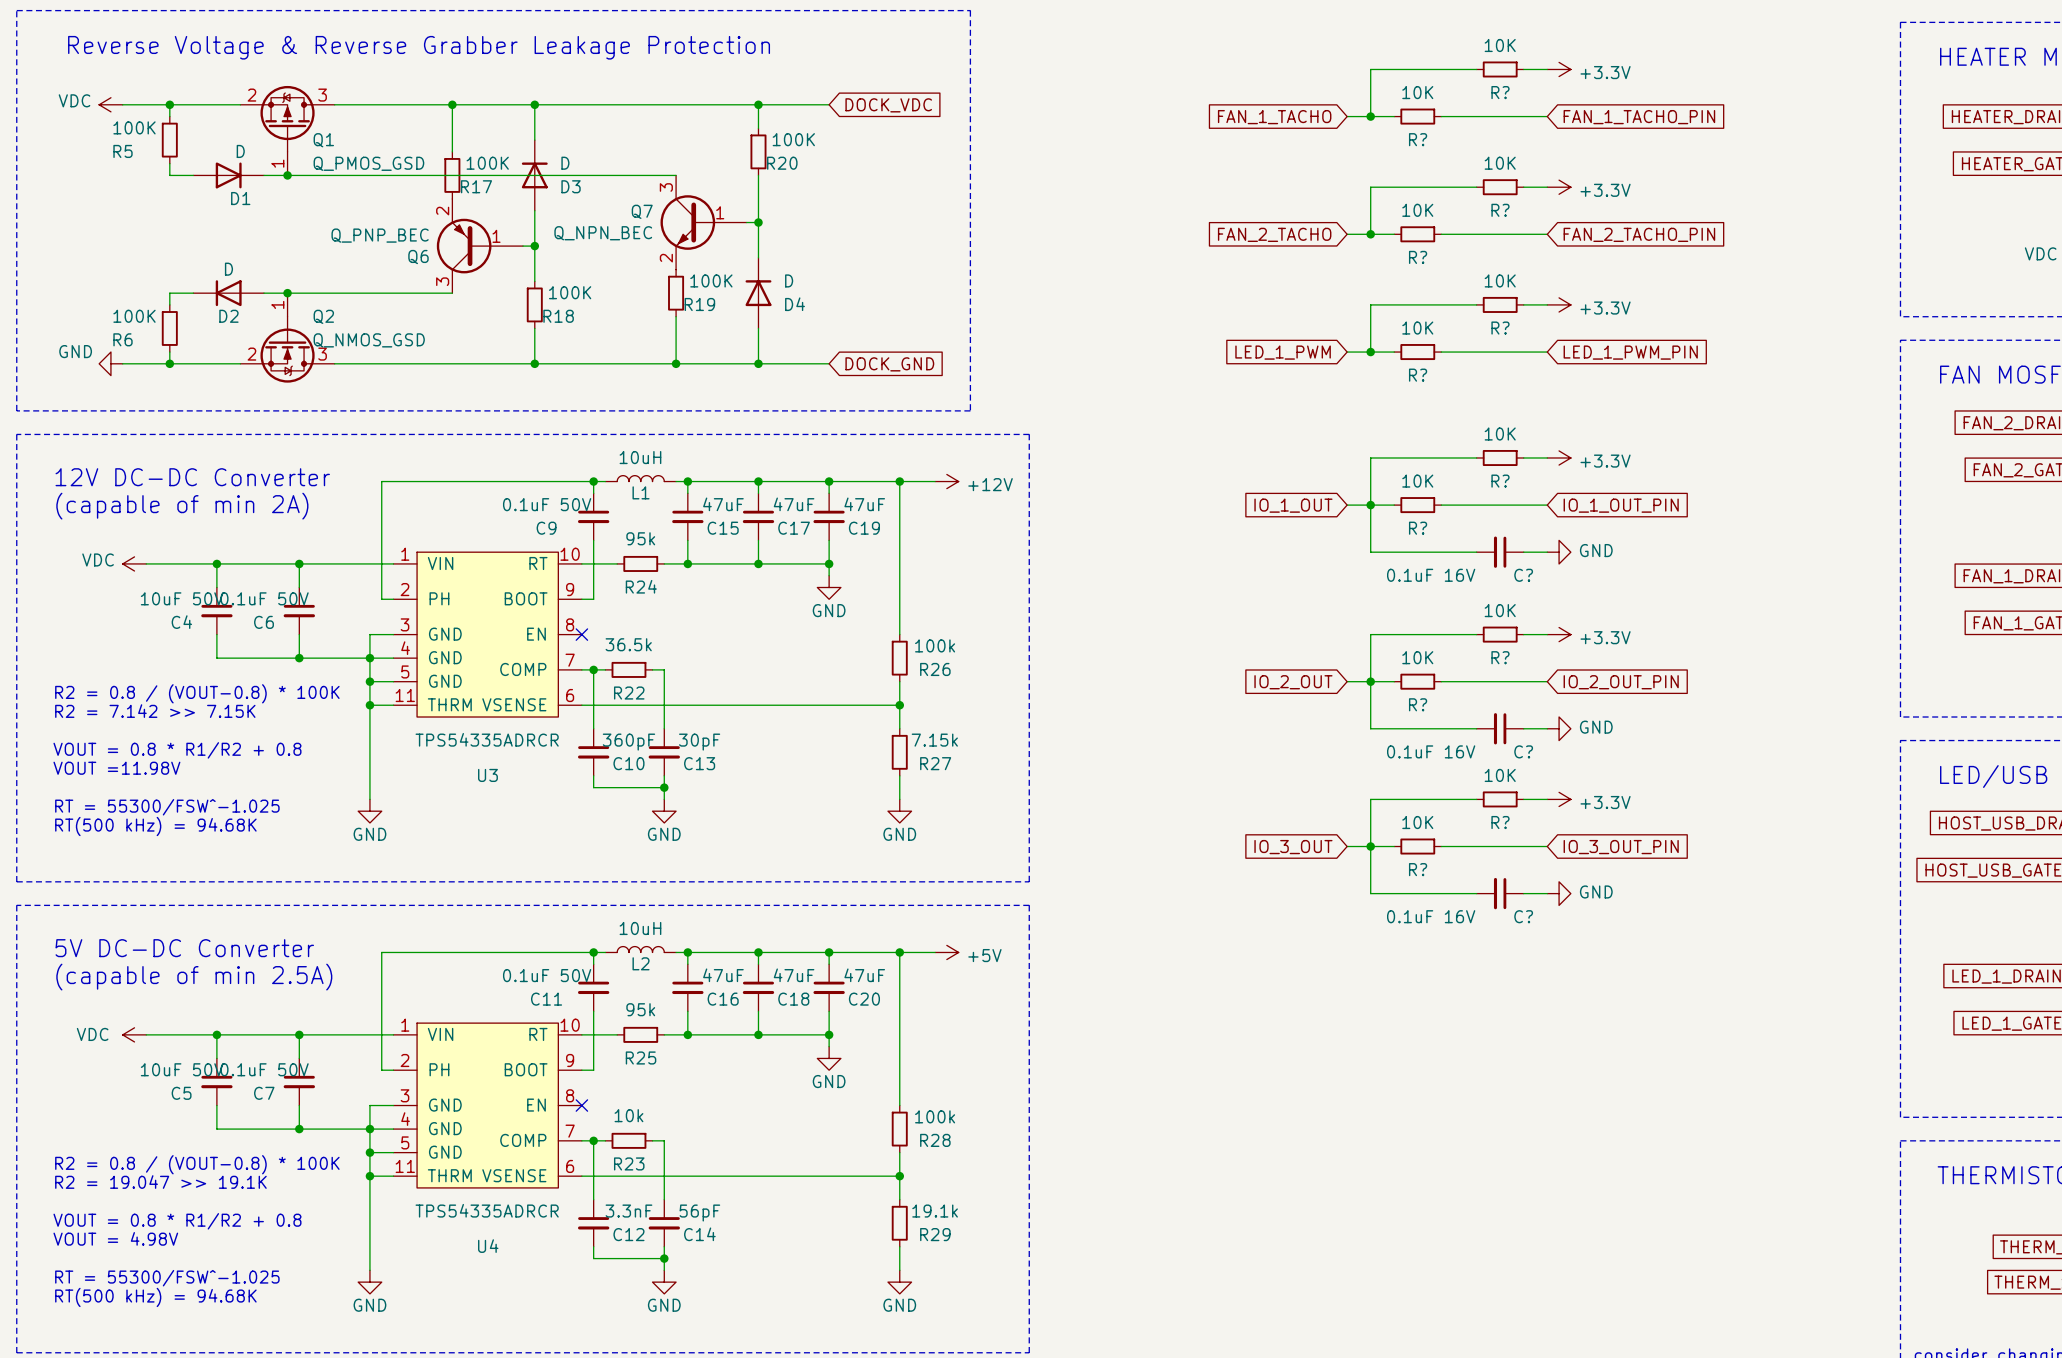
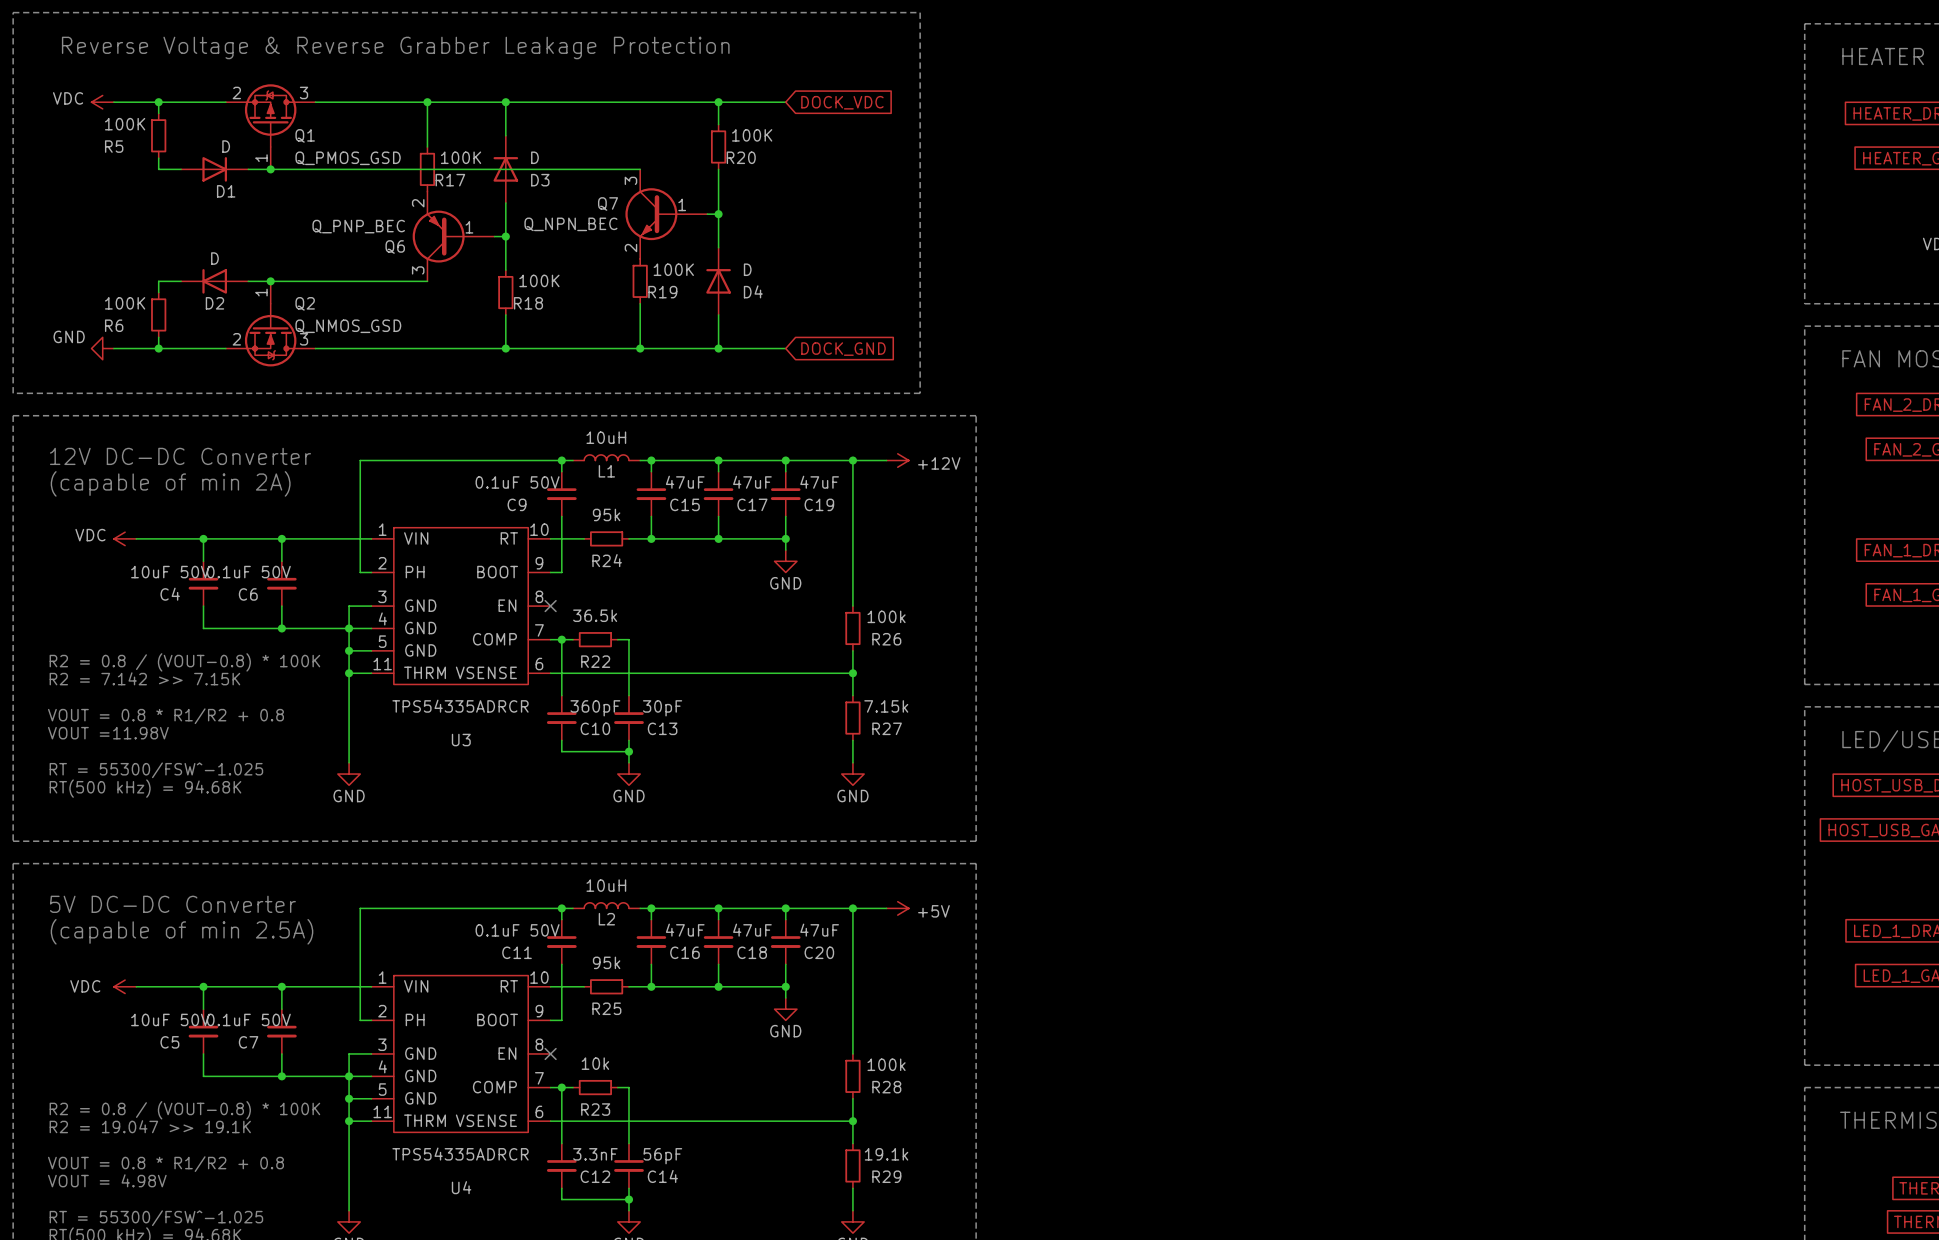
wire: (1476, 69) (1370, 69) (1370, 116) -> none
R?: 10K (1500, 69) -> none
wire: (1523, 69) (1547, 69) -> none
power symbol: +3.3V (1559, 69) -> none
wire: (1347, 116) (1394, 116) -> none
junction: (1370, 116) -> none
R?: 10K (1417, 116) -> none
wire: (1441, 116) (1547, 116) -> none
global label: FAN_1_TACHO (1274, 117) -> none
global label: FAN_1_TACHO_PIN (1639, 117) -> none
wire: (1476, 187) (1370, 187) (1370, 234) -> none
R?: 10K (1500, 187) -> none
wire: (1523, 187) (1547, 187) -> none
power symbol: +3.3V (1559, 187) -> none
global label: FAN_2_TACHO (1274, 234) -> none
wire: (1347, 234) (1394, 234) -> none
junction: (1370, 234) -> none
R?: 10K (1417, 234) -> none
wire: (1441, 234) (1547, 234) -> none
global label: FAN_2_TACHO_PIN (1639, 234) -> none
wire: (1476, 304) (1370, 304) (1370, 352) -> none
R?: 10K (1500, 304) -> none
wire: (1523, 304) (1547, 304) -> none
power symbol: +3.3V (1559, 304) -> none
global label: LED_1_PWM (1283, 352) -> none
wire: (1347, 352) (1394, 352) -> none
junction: (1370, 352) -> none
R?: 10K (1417, 352) -> none
wire: (1441, 352) (1547, 352) -> none
global label: LED_1_PWM_PIN (1630, 352) -> none
wire: (1476, 457) (1370, 457) (1370, 552) (1476, 552) -> none
R?: 10K (1500, 457) -> none
wire: (1523, 457) (1547, 457) -> none
power symbol: +3.3V (1559, 457) -> none
global label: IO_1_OUT (1293, 505) -> none
wire: (1347, 505) (1394, 505) -> none
junction: (1370, 505) -> none
R?: 10K (1417, 505) -> none
wire: (1441, 505) (1547, 505) -> none
global label: IO_1_OUT_PIN (1621, 505) -> none
C?: 0.1uF 16V (1500, 552) -> none
wire: (1523, 552) (1547, 552) -> none
power symbol: GND (1559, 552) -> none
wire: (1476, 634) (1370, 634) (1370, 728) (1476, 728) -> none
R?: 10K (1500, 634) -> none
wire: (1523, 634) (1547, 634) -> none
power symbol: +3.3V (1559, 634) -> none
wire: (1347, 681) (1394, 681) -> none
junction: (1370, 681) -> none
R?: 10K (1417, 681) -> none
wire: (1441, 681) (1547, 681) -> none
global label: IO_2_OUT (1293, 682) -> none
global label: IO_2_OUT_PIN (1621, 682) -> none
C?: 0.1uF 16V (1500, 728) -> none
wire: (1523, 728) (1547, 728) -> none
power symbol: GND (1559, 728) -> none
wire: (1476, 799) (1370, 799) (1370, 893) (1476, 893) -> none
R?: 10K (1500, 799) -> none
wire: (1523, 799) (1547, 799) -> none
power symbol: +3.3V (1559, 799) -> none
wire: (1347, 846) (1394, 846) -> none
junction: (1370, 846) -> none
R?: 10K (1417, 846) -> none
wire: (1441, 846) (1547, 846) -> none
global label: IO_3_OUT (1293, 847) -> none
global label: IO_3_OUT_PIN (1621, 847) -> none
C?: 0.1uF 16V (1500, 893) -> none
wire: (1523, 893) (1547, 893) -> none
power symbol: GND (1559, 893) -> none

